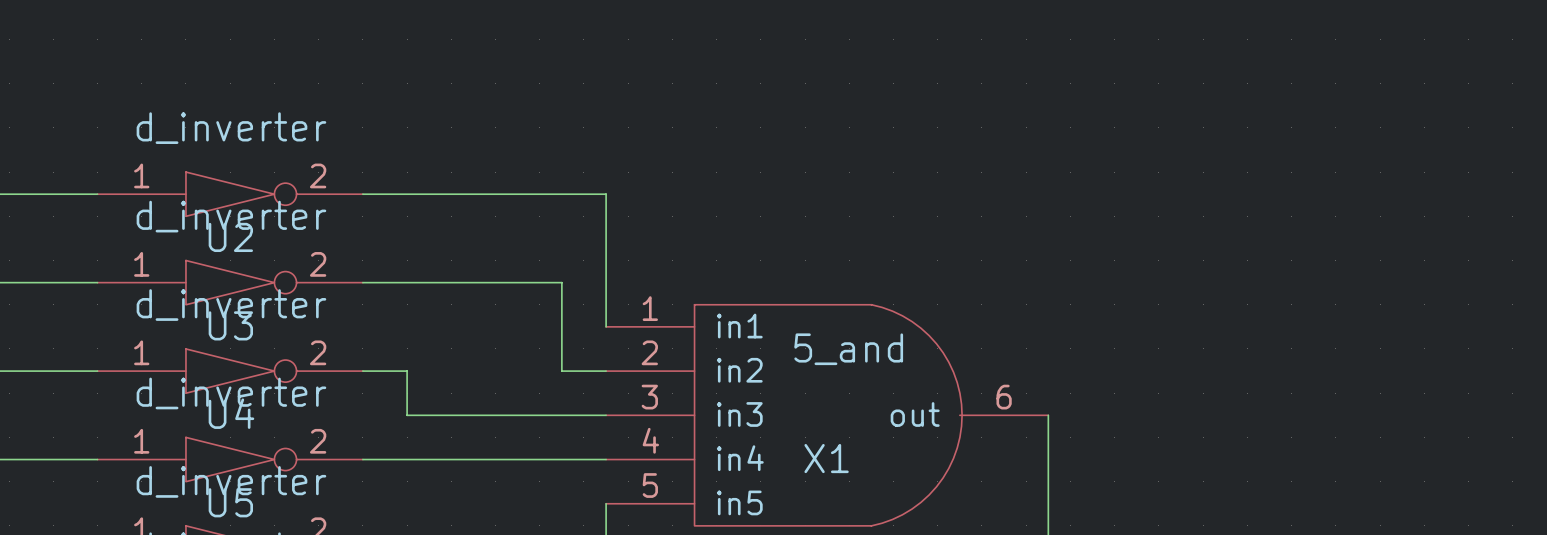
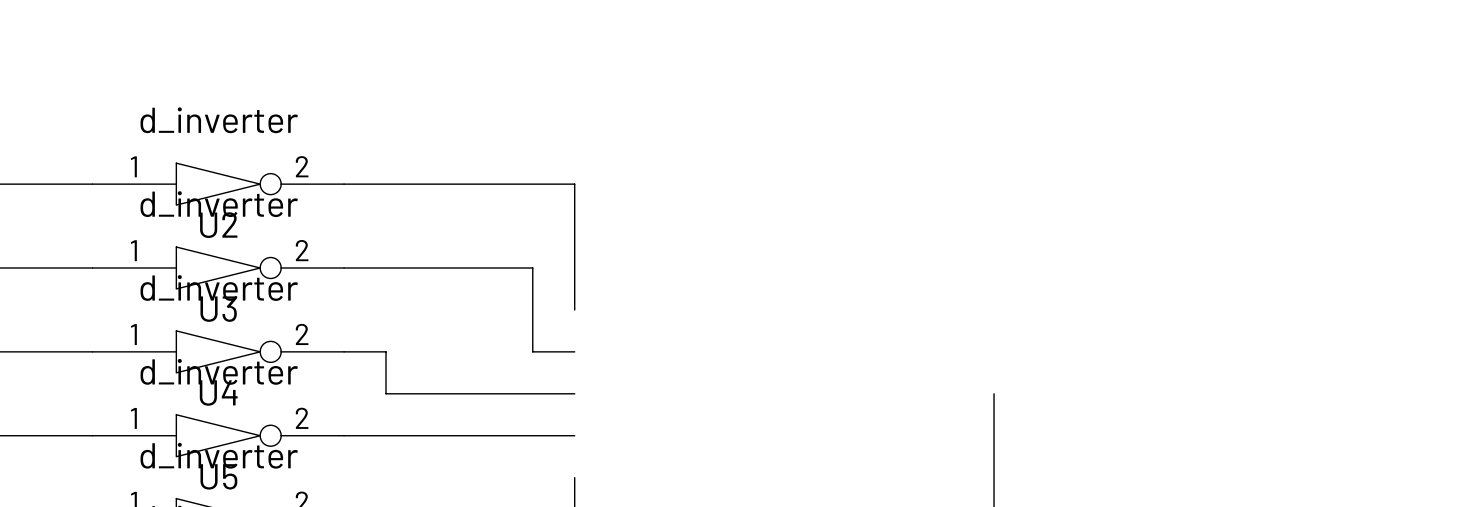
X1: 5_and (827, 415) -> none

